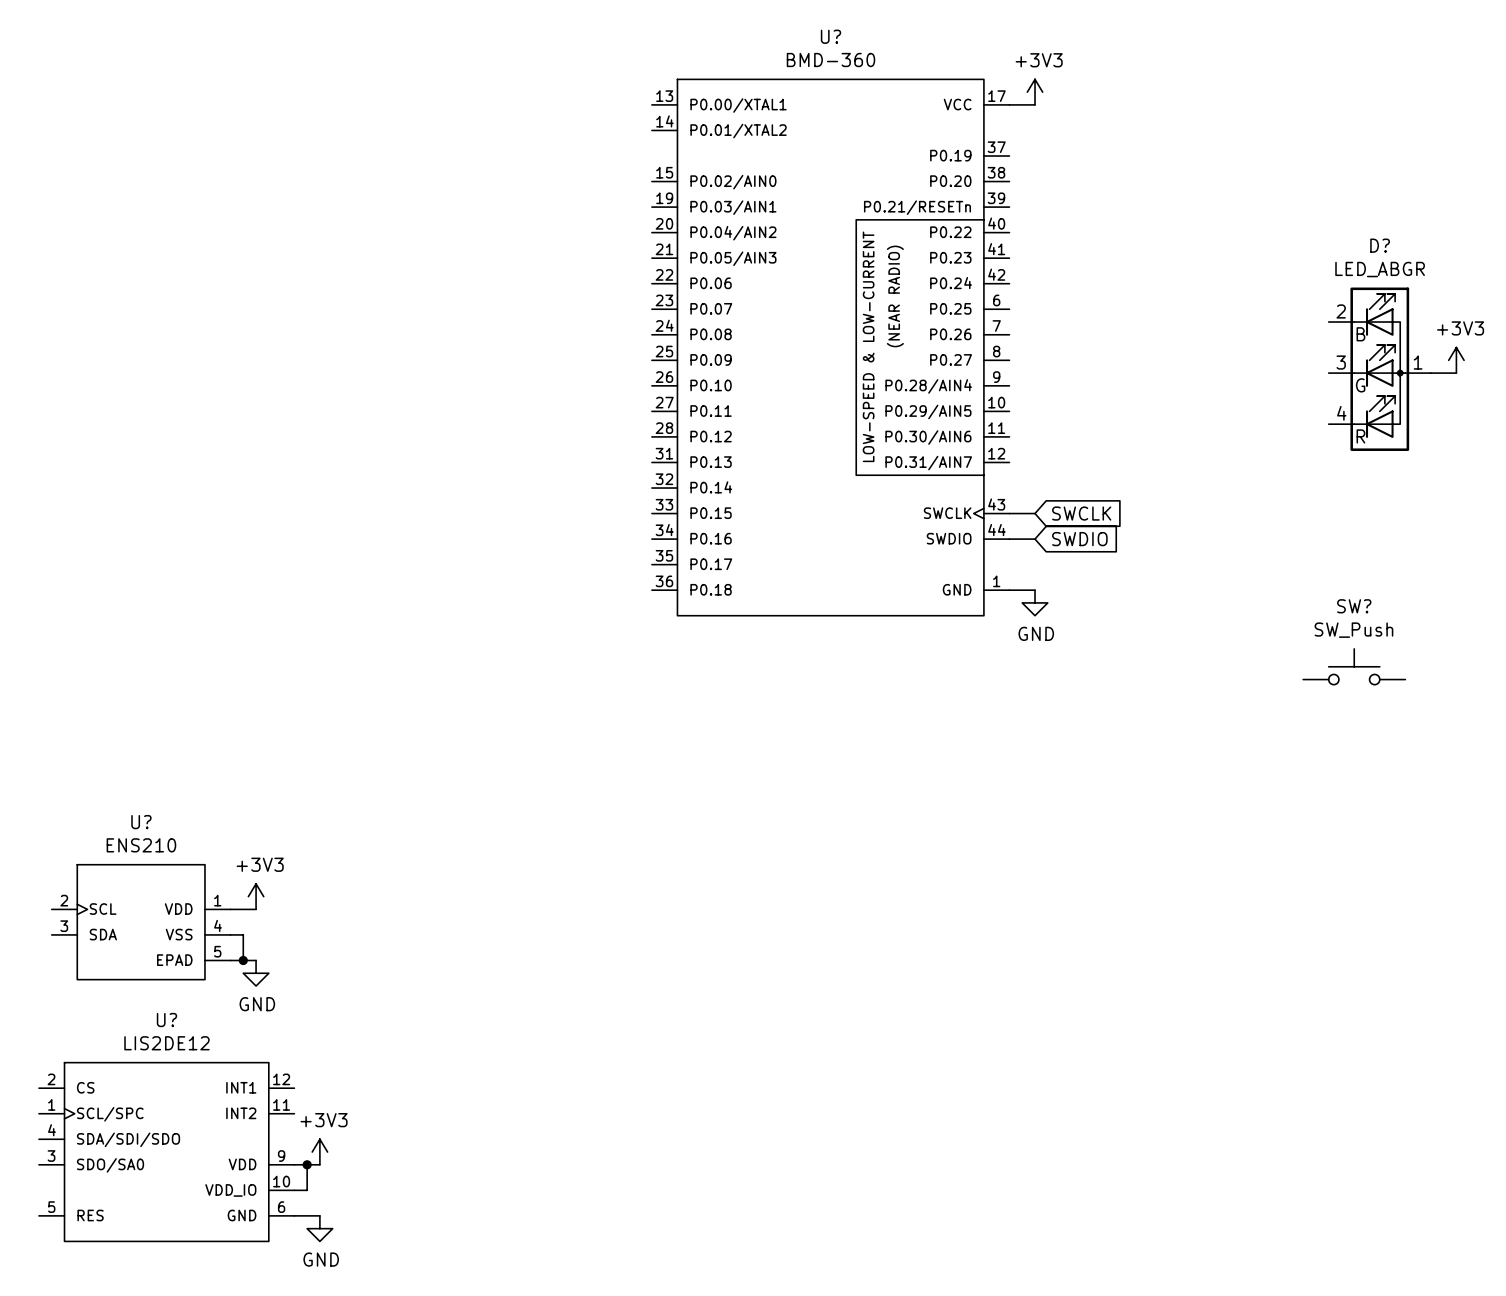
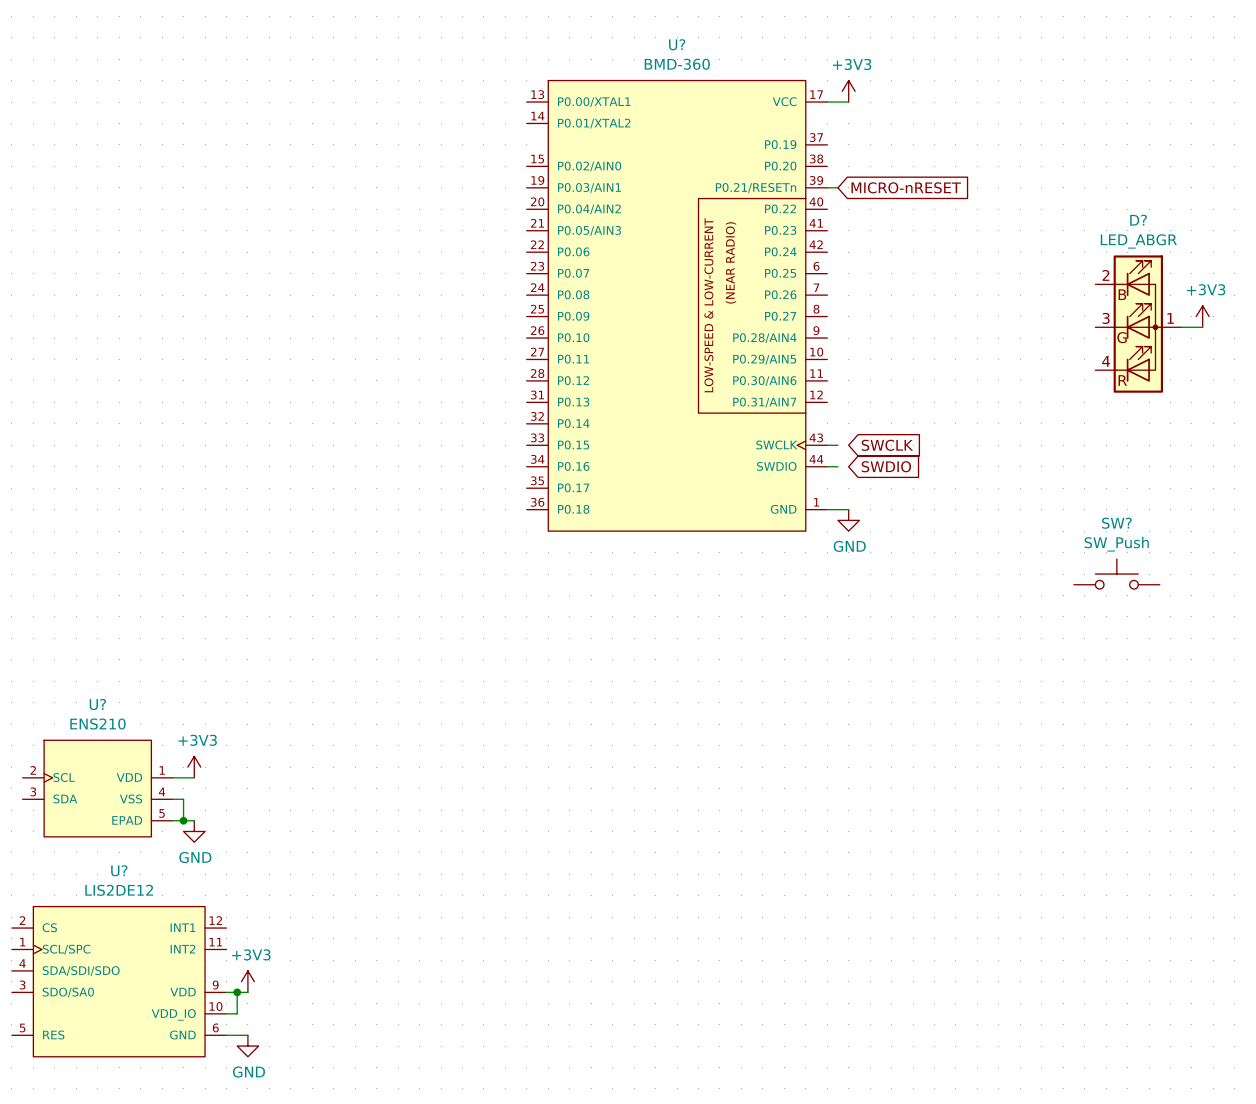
wire: none -> (827, 187) (837, 187)
global label: none -> MICRO-nRESET (906, 187)
wire: (1022, 513) (1035, 513) -> none
wire: (1022, 539) (1035, 539) -> none

